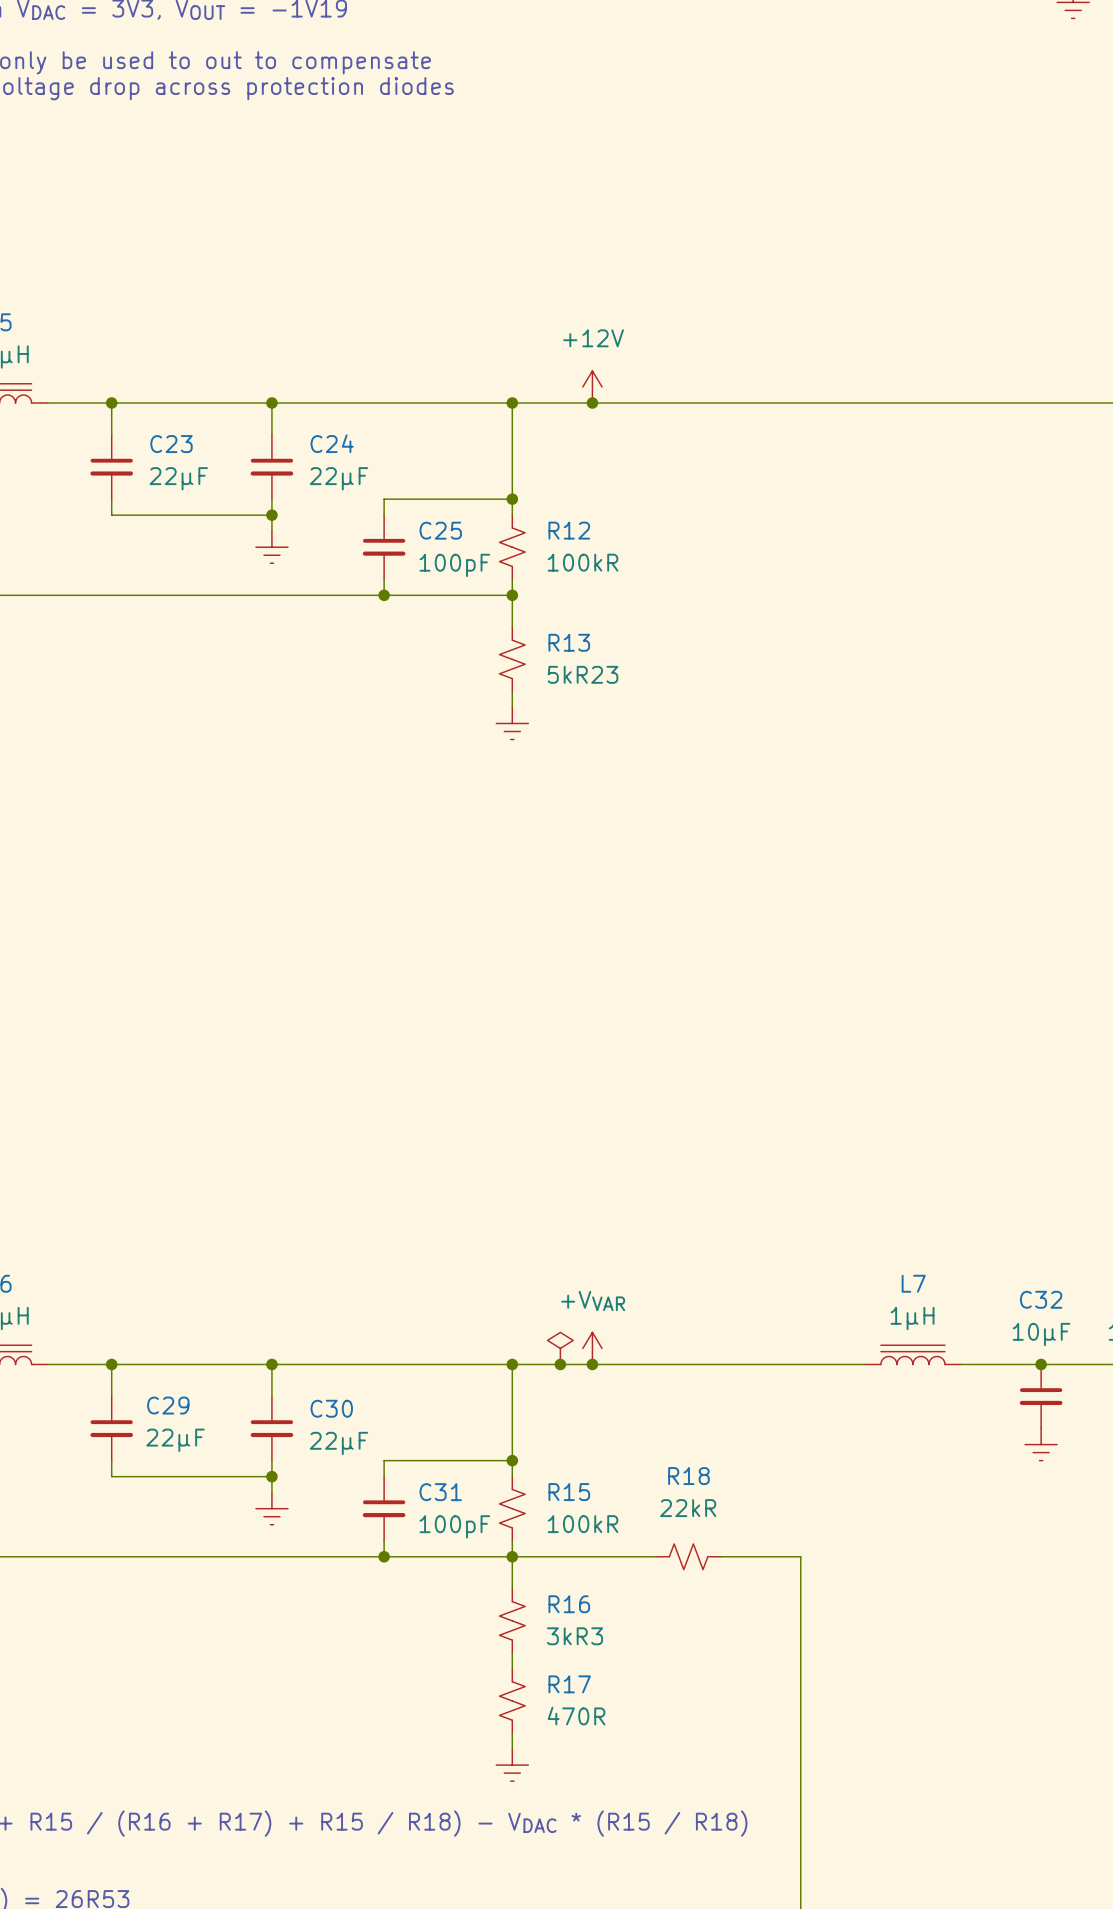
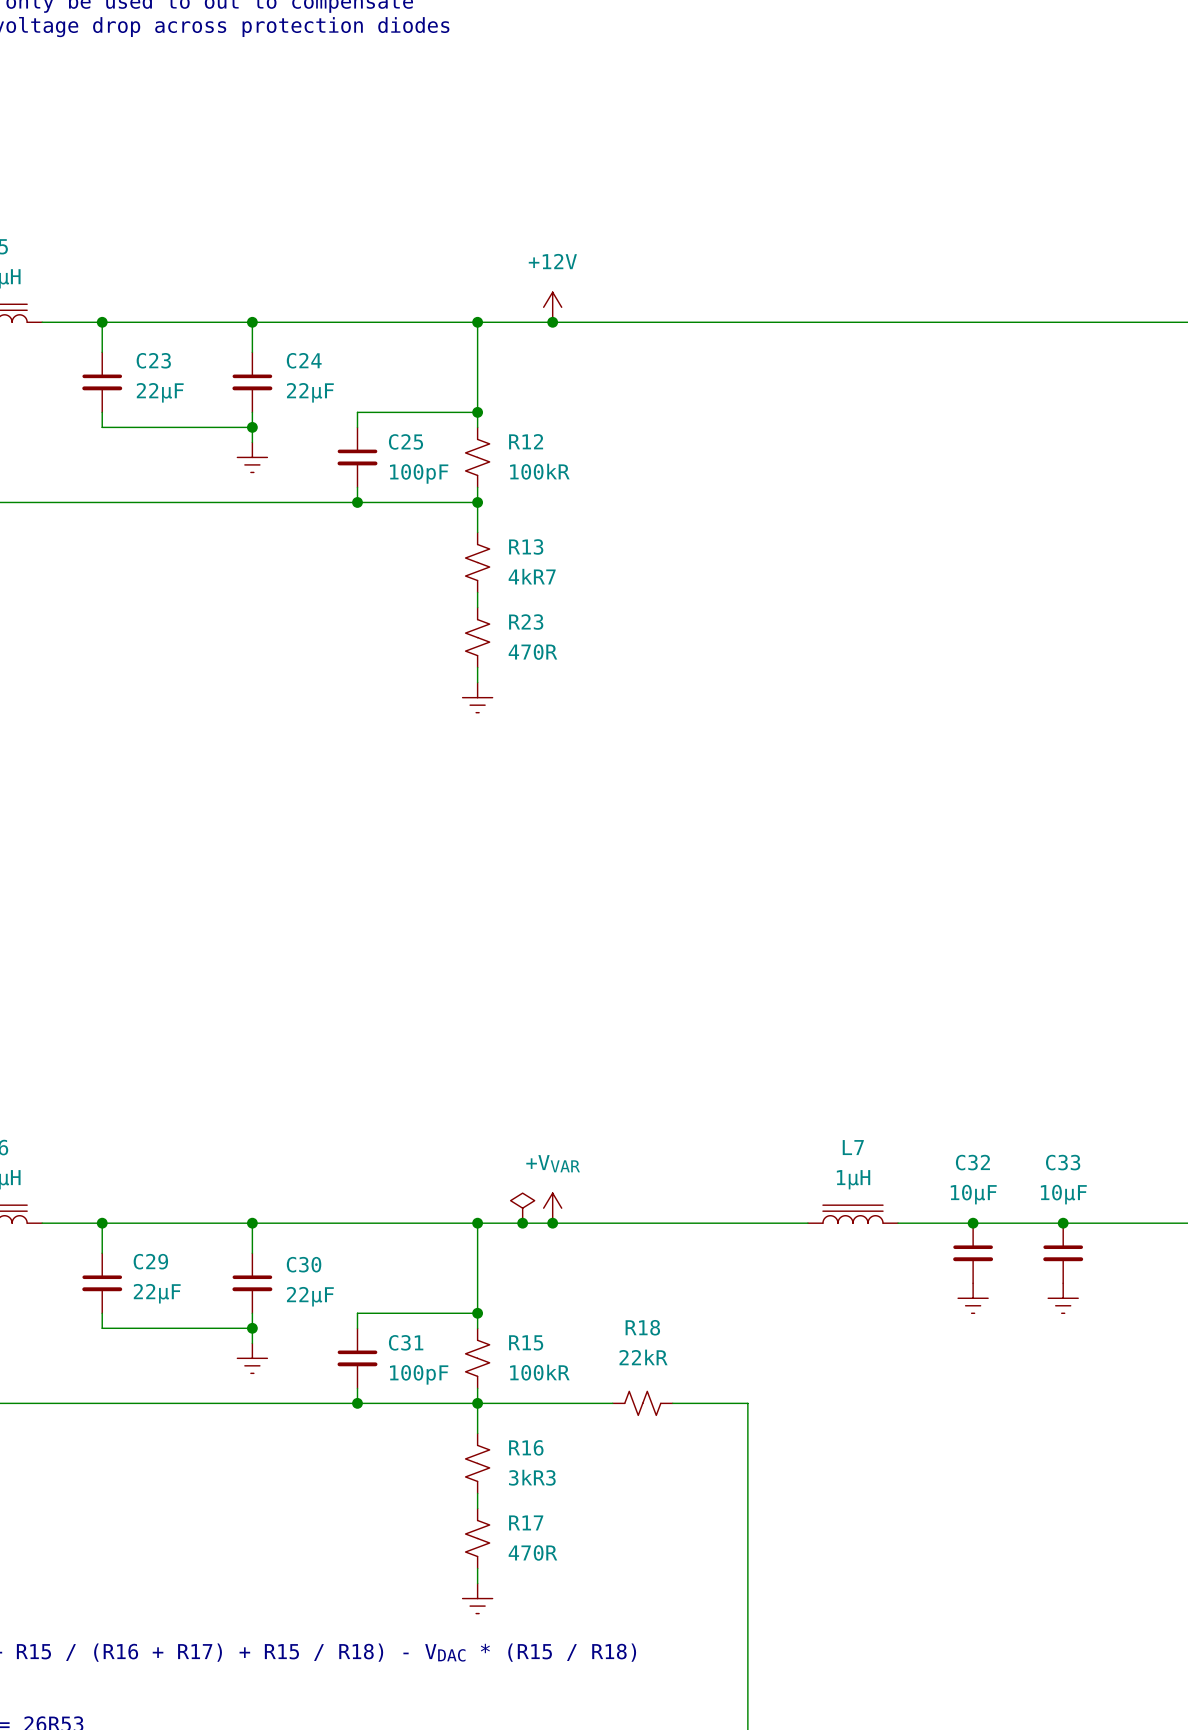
R13 value: 5kR23 (583, 674) -> 4kR7 (532, 576)
power symbol position: (512, 723) -> (477, 697)
R23: none -> 470R (477, 637)
wire: none -> (477, 667) (477, 682)

